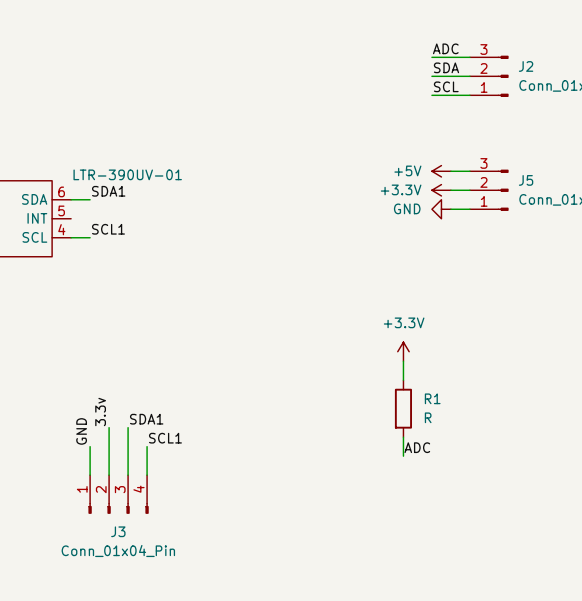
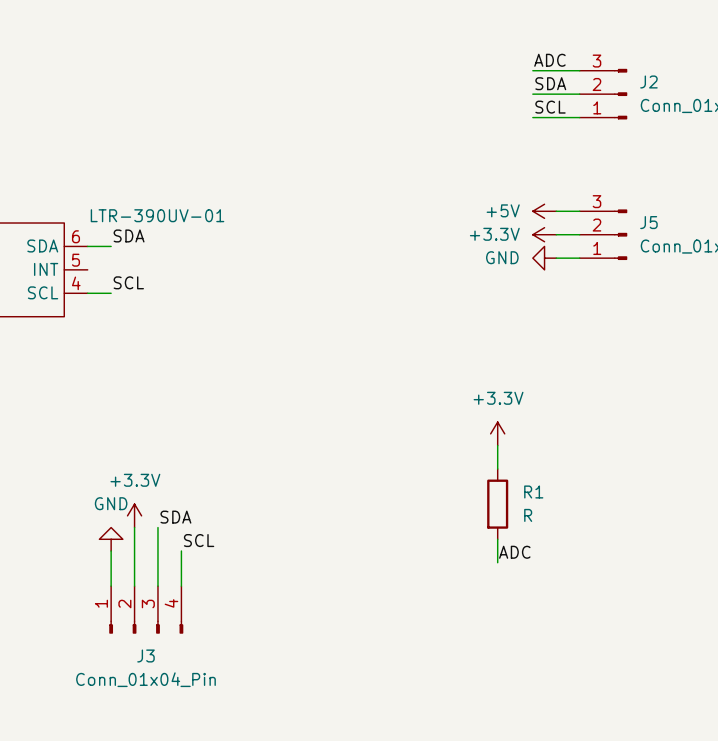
label: SDA1 (108, 191) -> SDA (129, 235)
label: SCL1 (108, 229) -> SCL (128, 282)
label: 3.3v (100, 412) -> none
power symbol: none -> +3.3V (134, 515)
label: SDA1 (146, 419) -> SDA (175, 517)
label: GND (81, 431) -> none
power symbol: none -> GND (111, 539)
label: SCL1 (165, 438) -> SCL (199, 540)

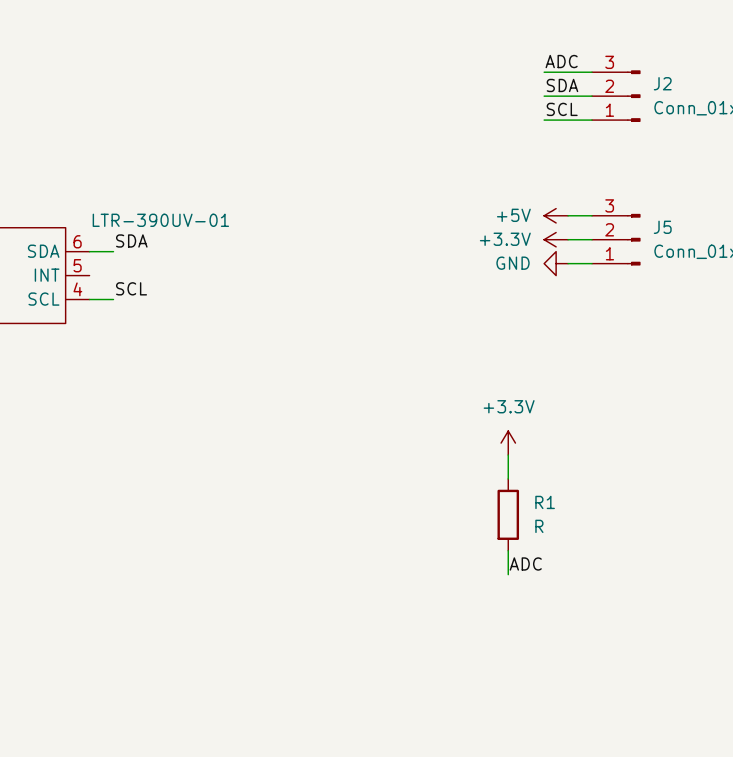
power symbol: +3.3V (134, 515) -> none
label: SDA (175, 517) -> none
wire: (134, 527) (134, 586) -> none
wire: (157, 527) (157, 586) -> none
power symbol: GND (111, 539) -> none
label: SCL (199, 540) -> none
wire: (111, 551) (111, 586) -> none
wire: (181, 551) (181, 586) -> none
J3: Conn_01x04_Pin (146, 609) -> none

